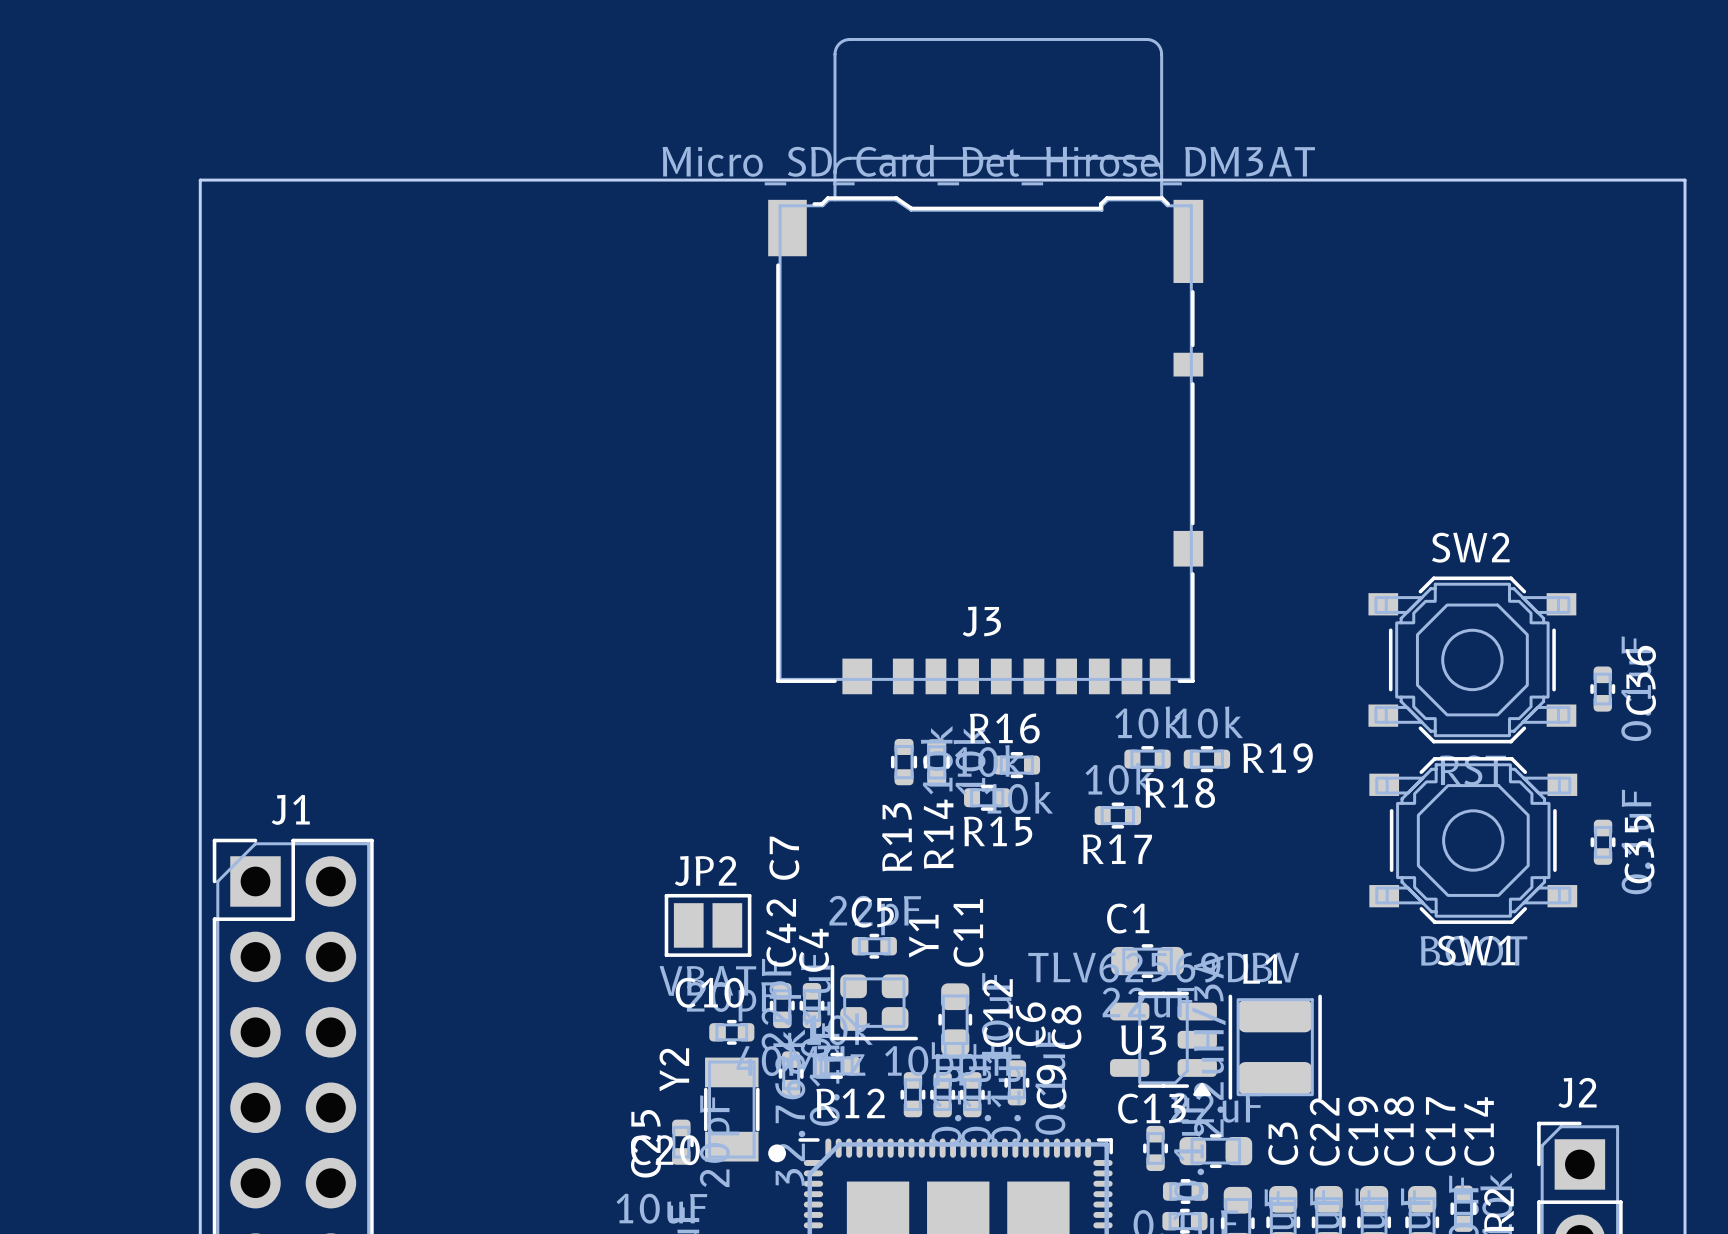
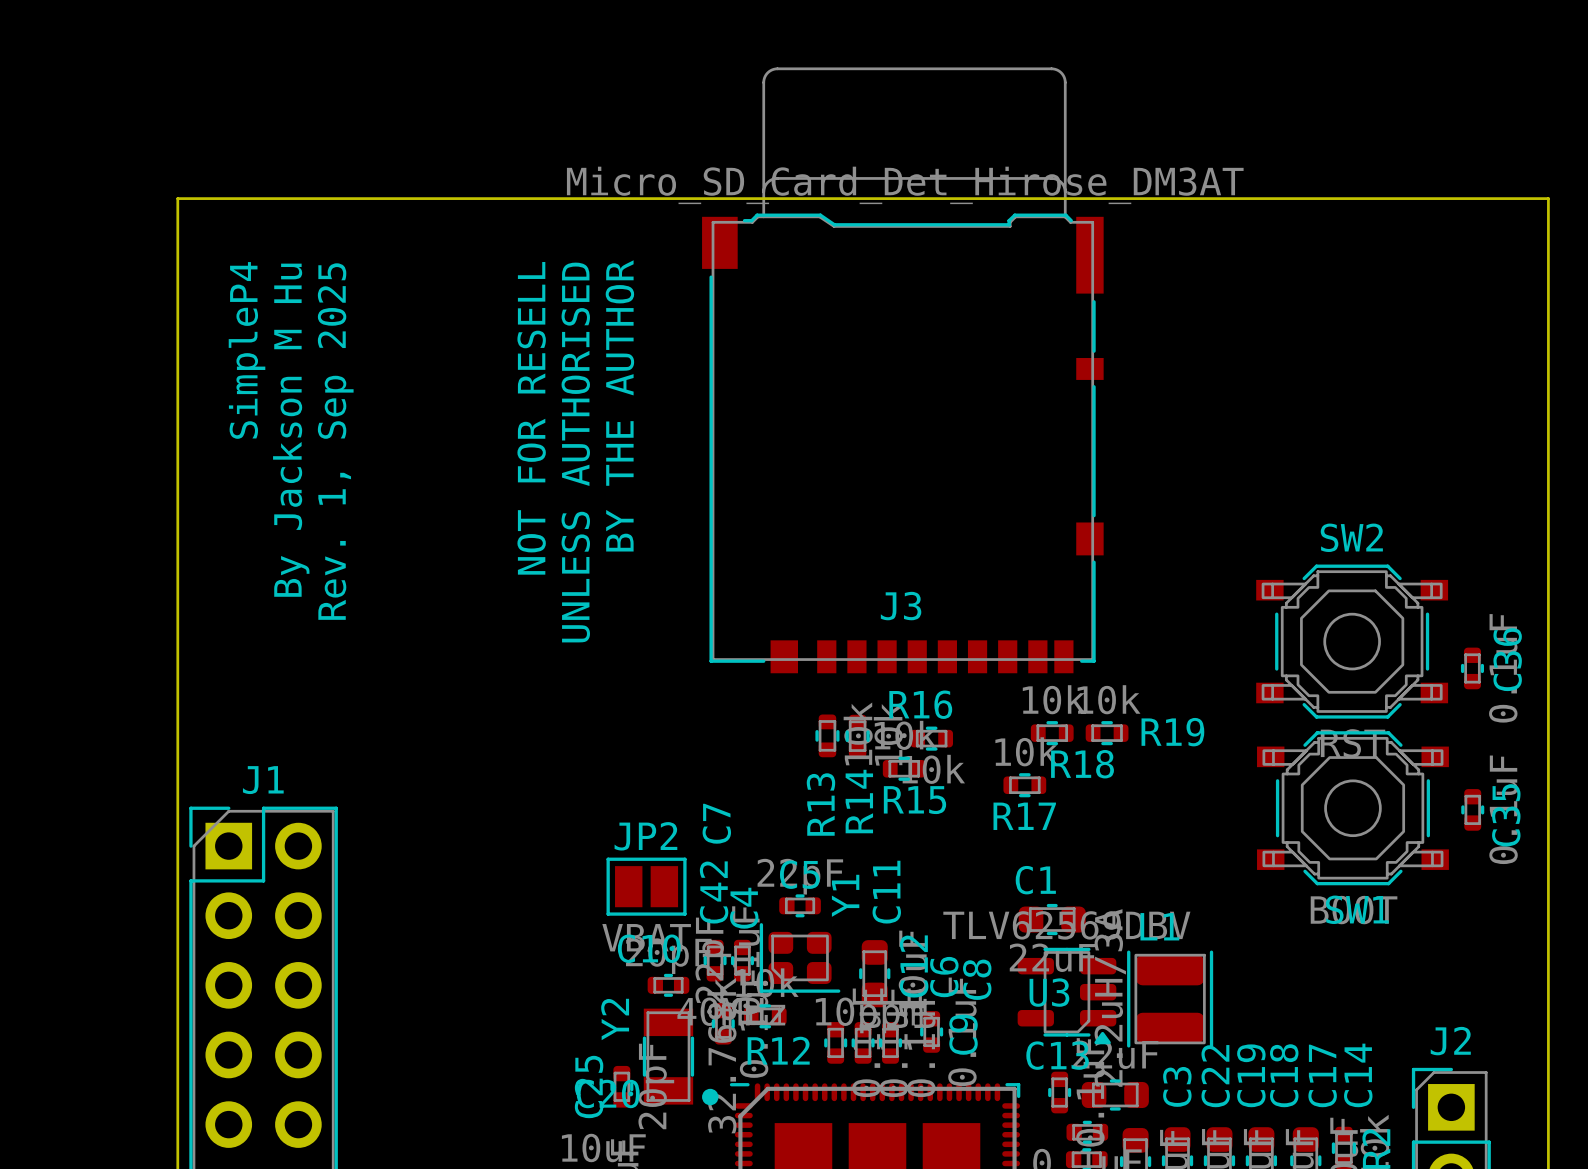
text: none -> SimpleP4 (247, 350)
text: none -> BY THE AUTHOR (619, 405)
text: none -> By Jackson M Hu (291, 430)
text: none -> NOT FOR RESELL (531, 418)
text: none -> Rev. 1, Sep 2025 (335, 441)
text: none -> UNLESS AUTHORISED (575, 452)

